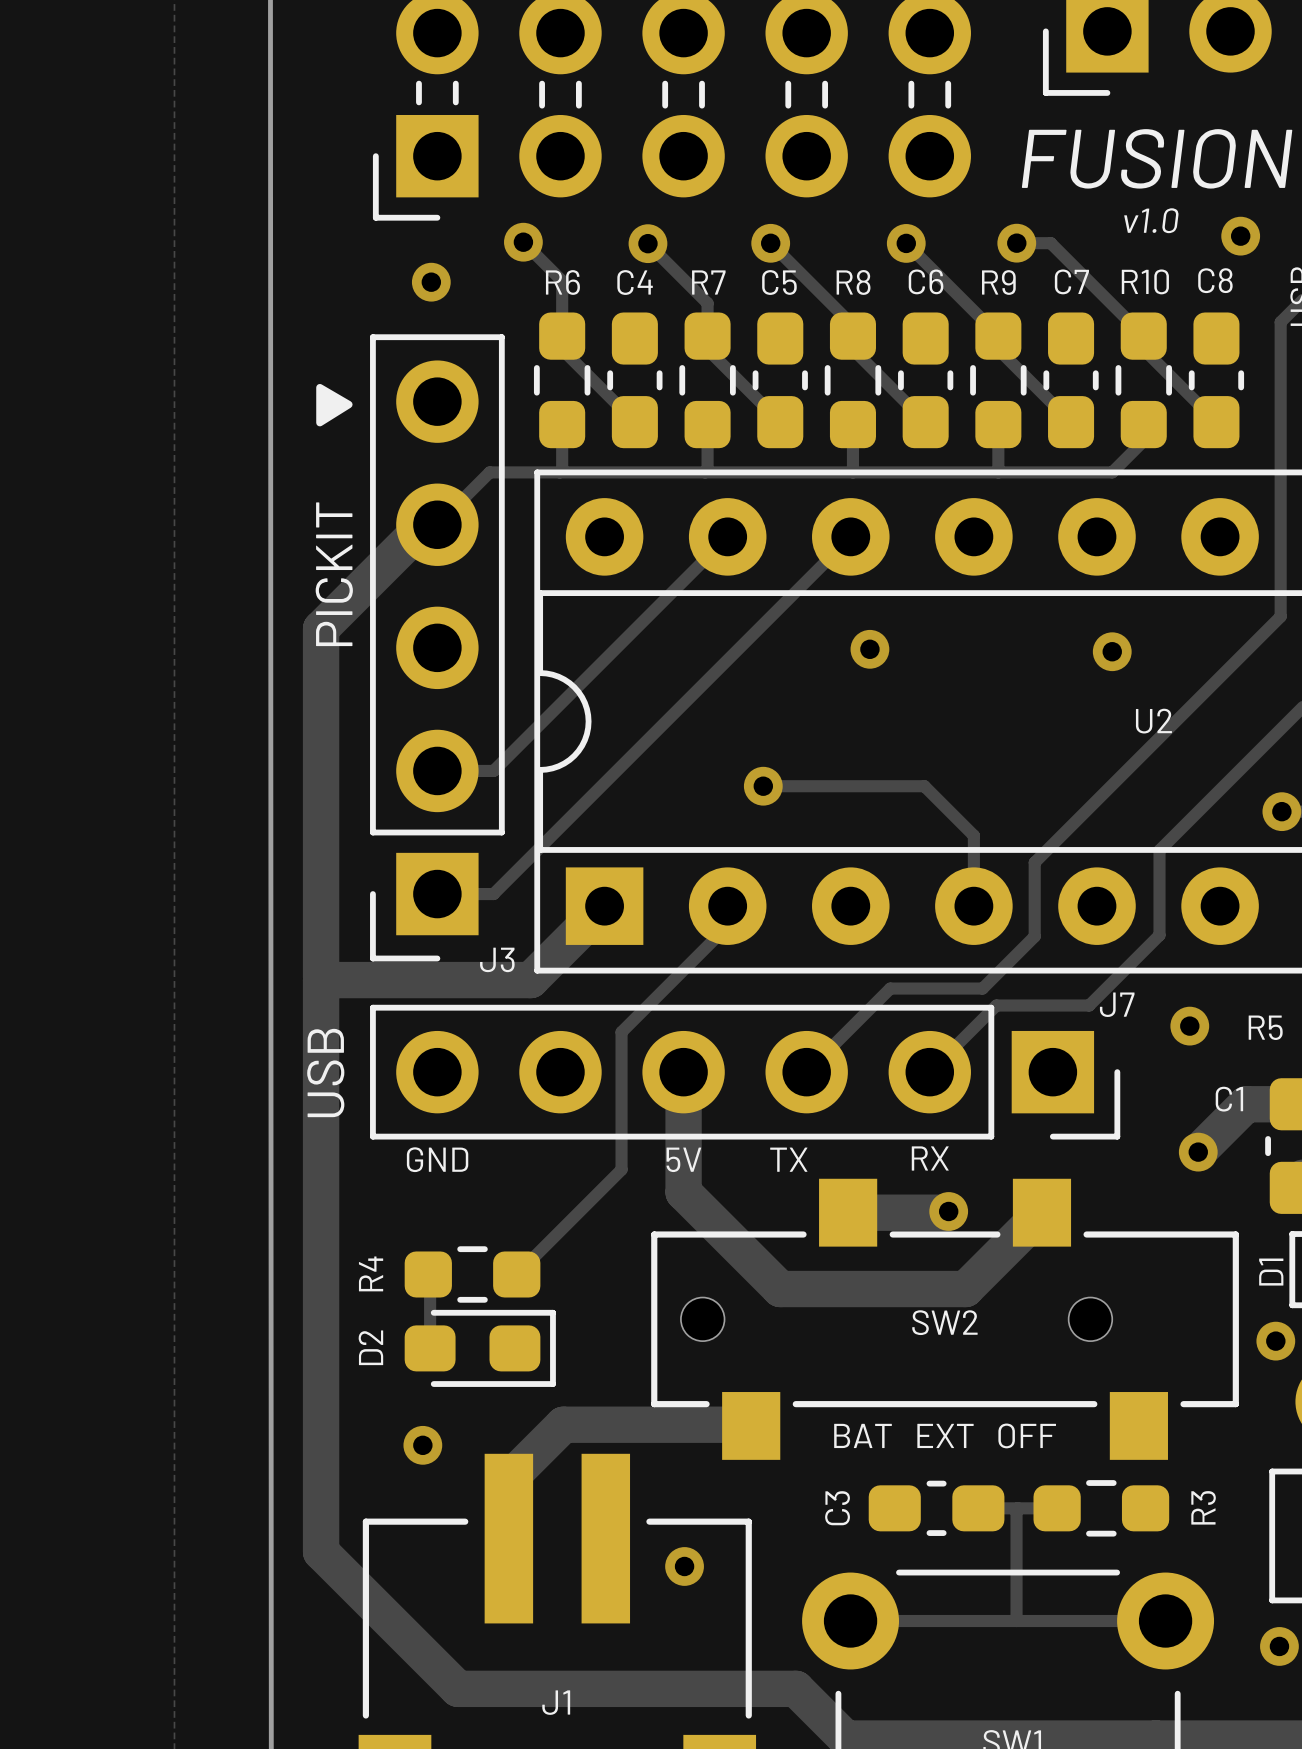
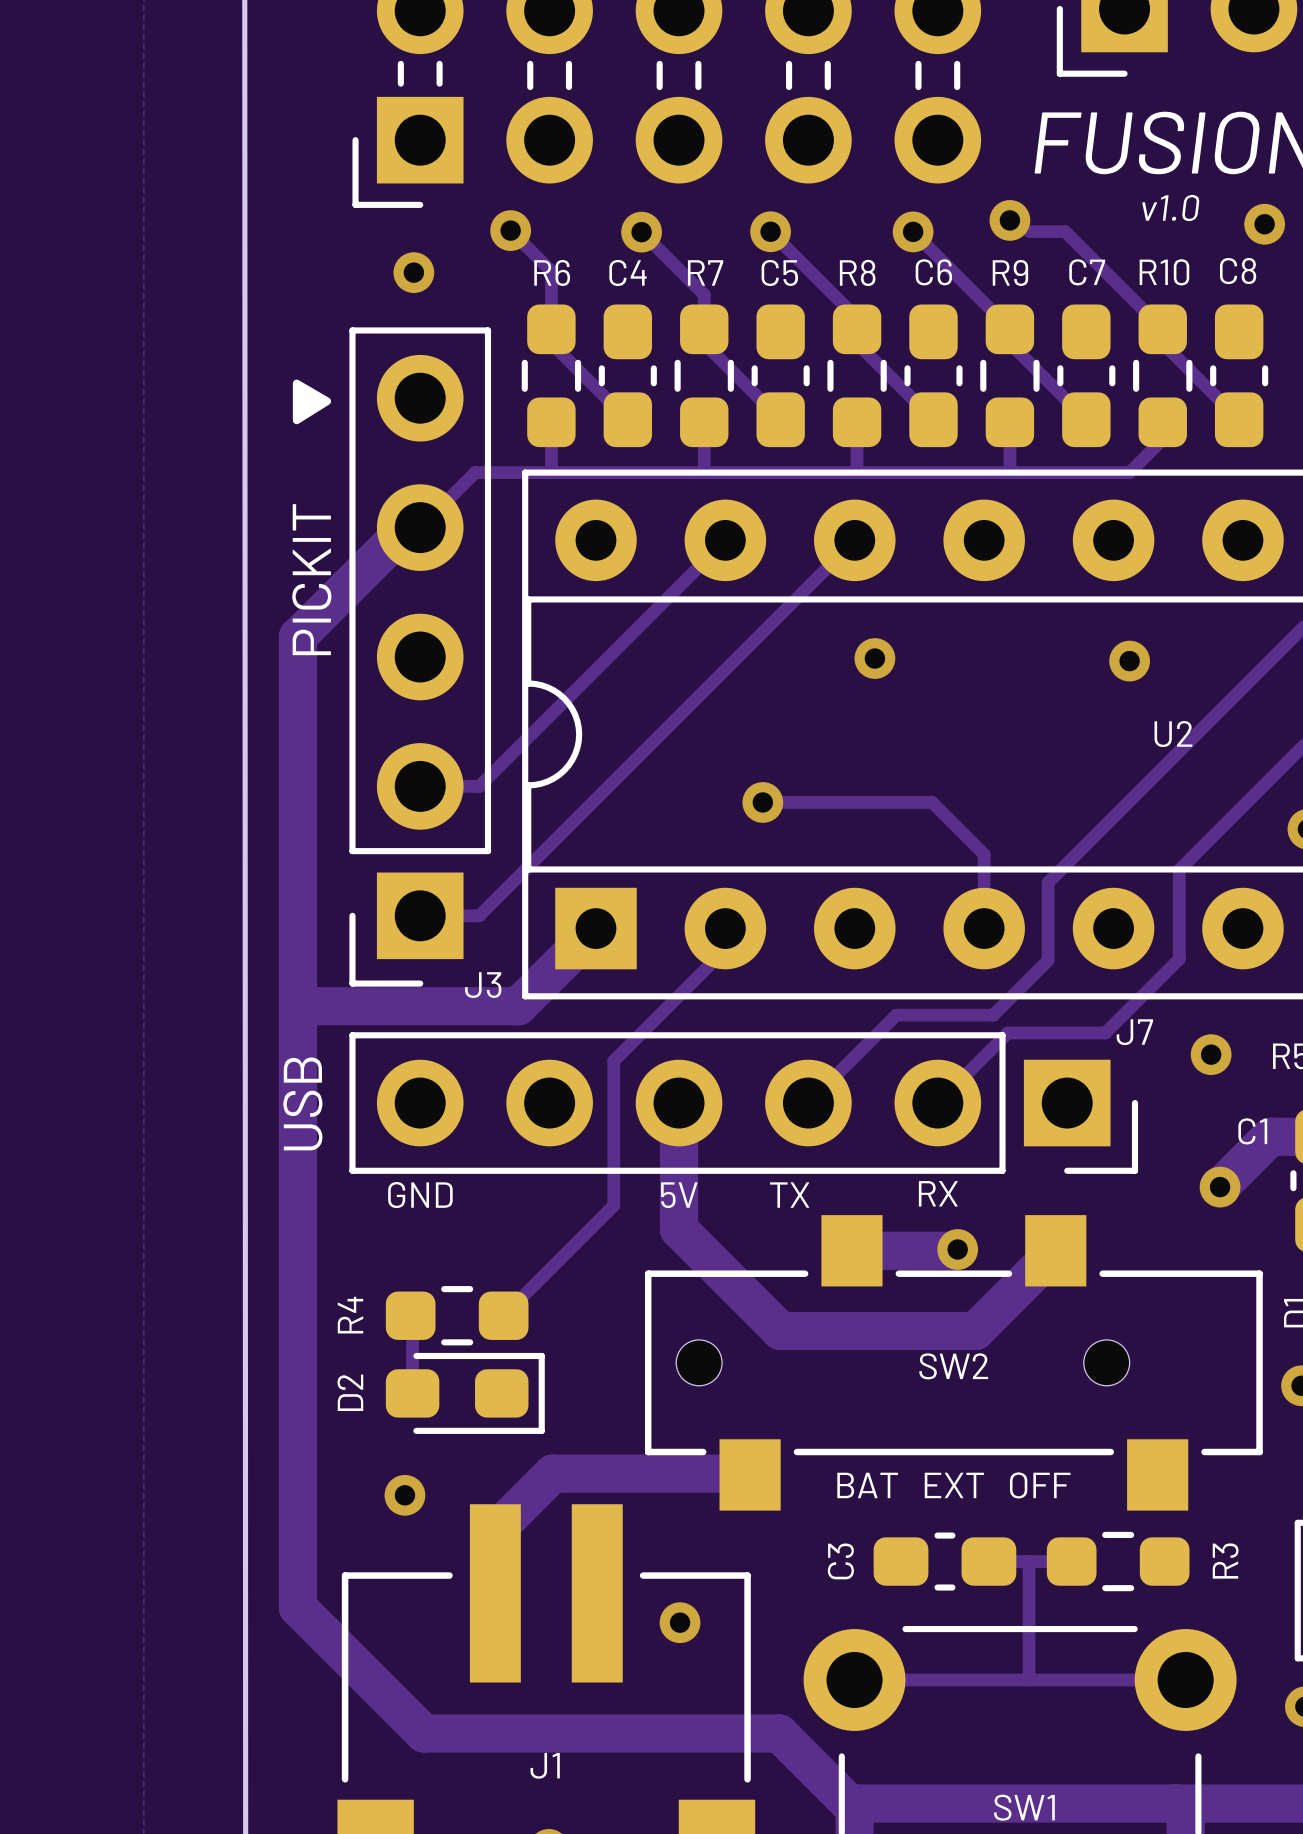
via position: (1016, 243) -> (1009, 220)
track: (441, 1671) (457, 1688) (796, 1688) -> (424, 1733) (779, 1733) (797, 1751)

